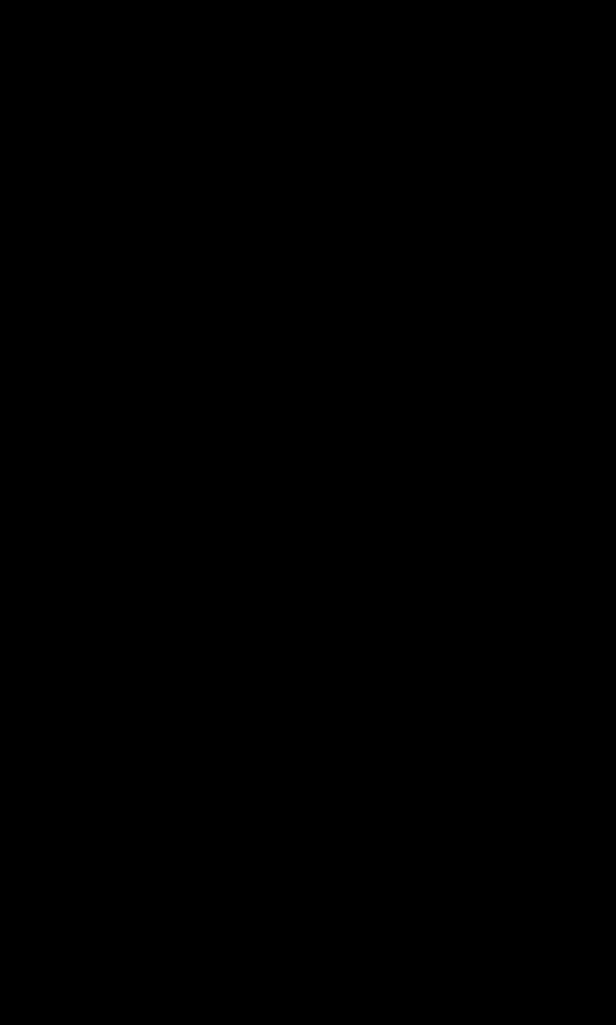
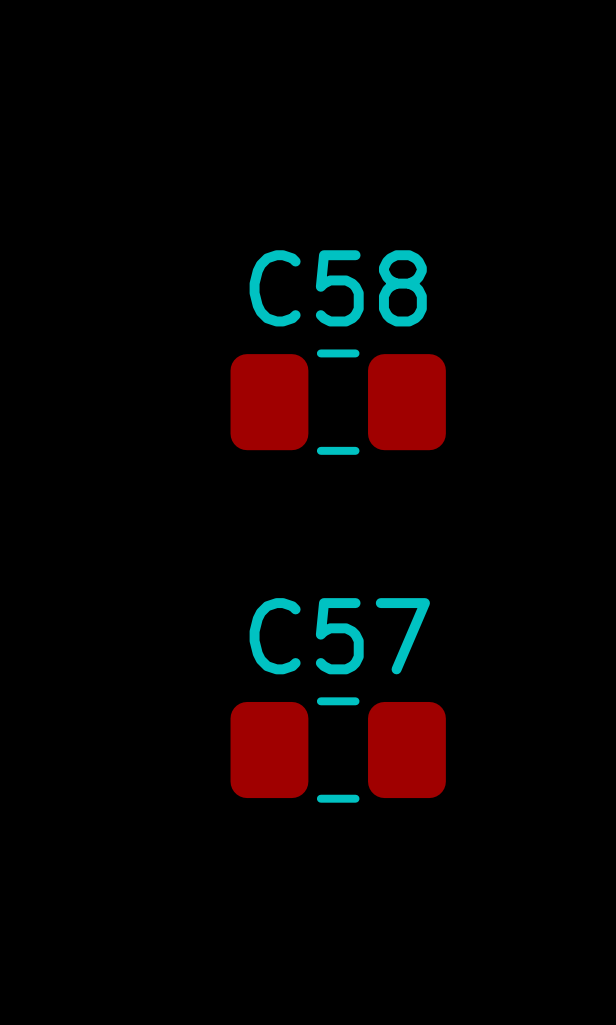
C58: none -> (338, 402)
C57: none -> (338, 750)

